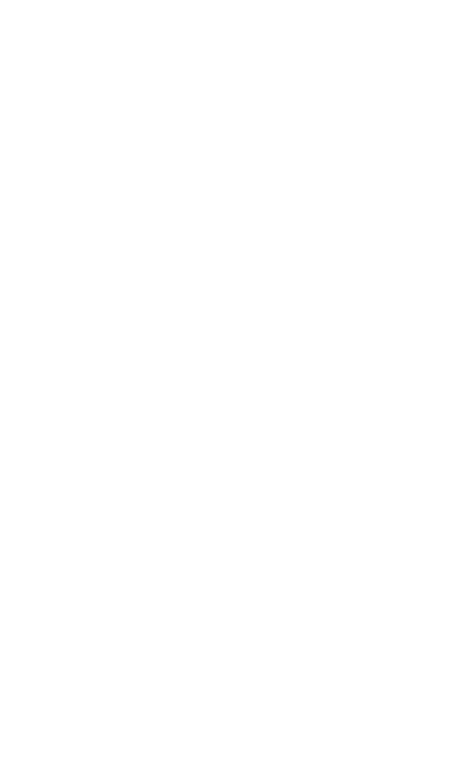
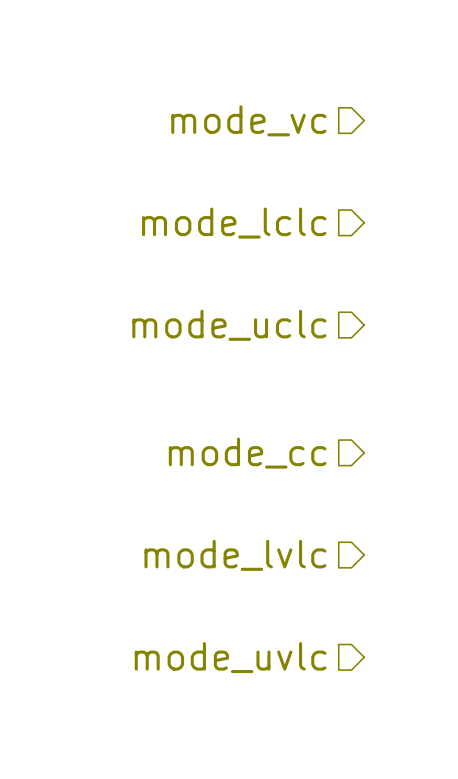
hierarchical label: none -> mode_vc (248, 120)
hierarchical label: none -> mode_lclc (234, 223)
hierarchical label: none -> mode_uclc (229, 325)
hierarchical label: none -> mode_cc (247, 453)
hierarchical label: none -> mode_lvlc (235, 555)
hierarchical label: none -> mode_uvlc (230, 657)

